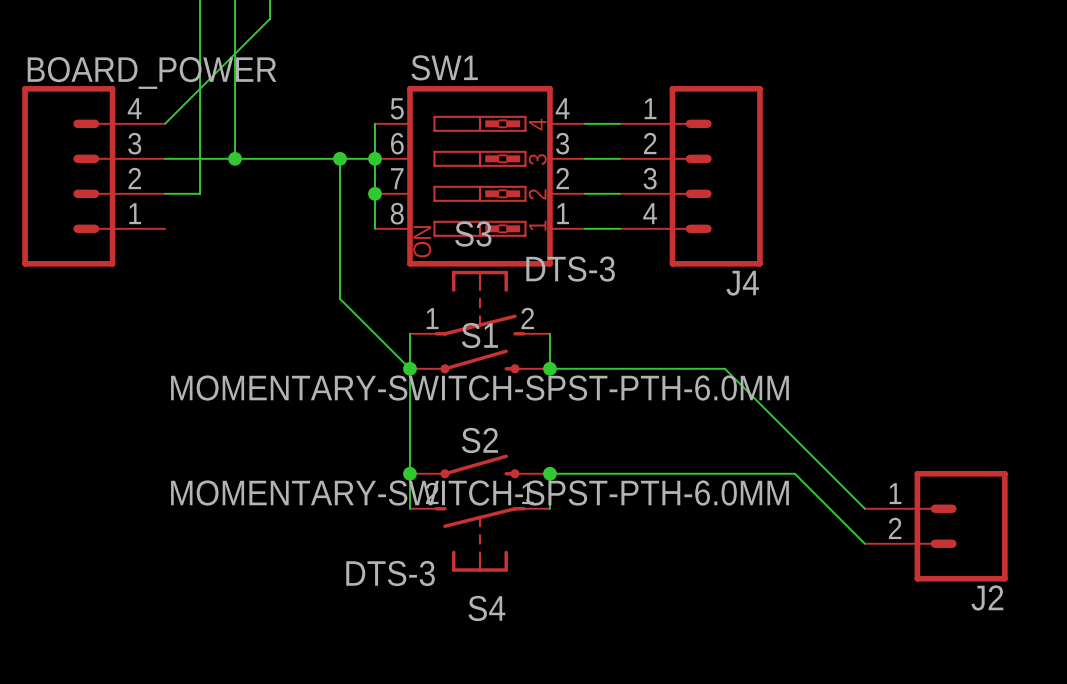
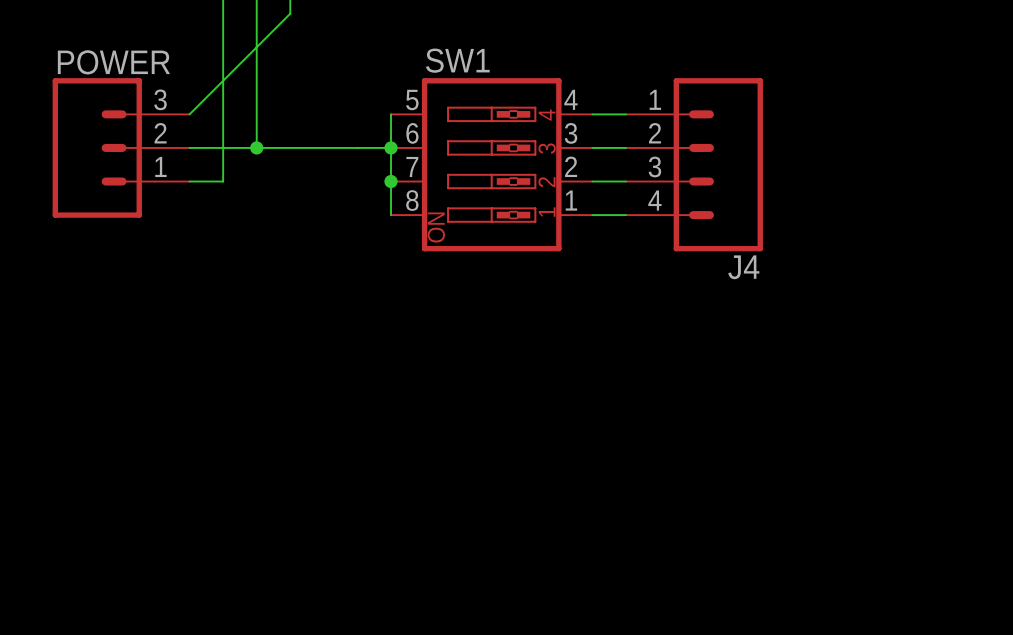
POWER: none -> (121, 147)
wire: (340, 158) (340, 298) (409, 368) -> none
junction: (340, 158) -> none
BOARD_POWER: (93, 176) -> none
S3: DTS-3 (479, 303) -> none
wire: (409, 333) (409, 508) -> none
wire: (549, 333) (549, 368) (724, 368) (864, 508) -> none
S1: MOMENTARY-SWITCH-SPST-PTH-6.0MM (479, 361) -> none
junction: (409, 368) -> none
junction: (549, 368) -> none
S2: MOMENTARY-SWITCH-SPST-PTH-6.0MM (479, 466) -> none
junction: (409, 473) -> none
junction: (549, 473) -> none
wire: (549, 508) (549, 473) (794, 473) (864, 543) -> none
J2: (936, 526) -> none
S4: DTS-3 (479, 539) -> none

